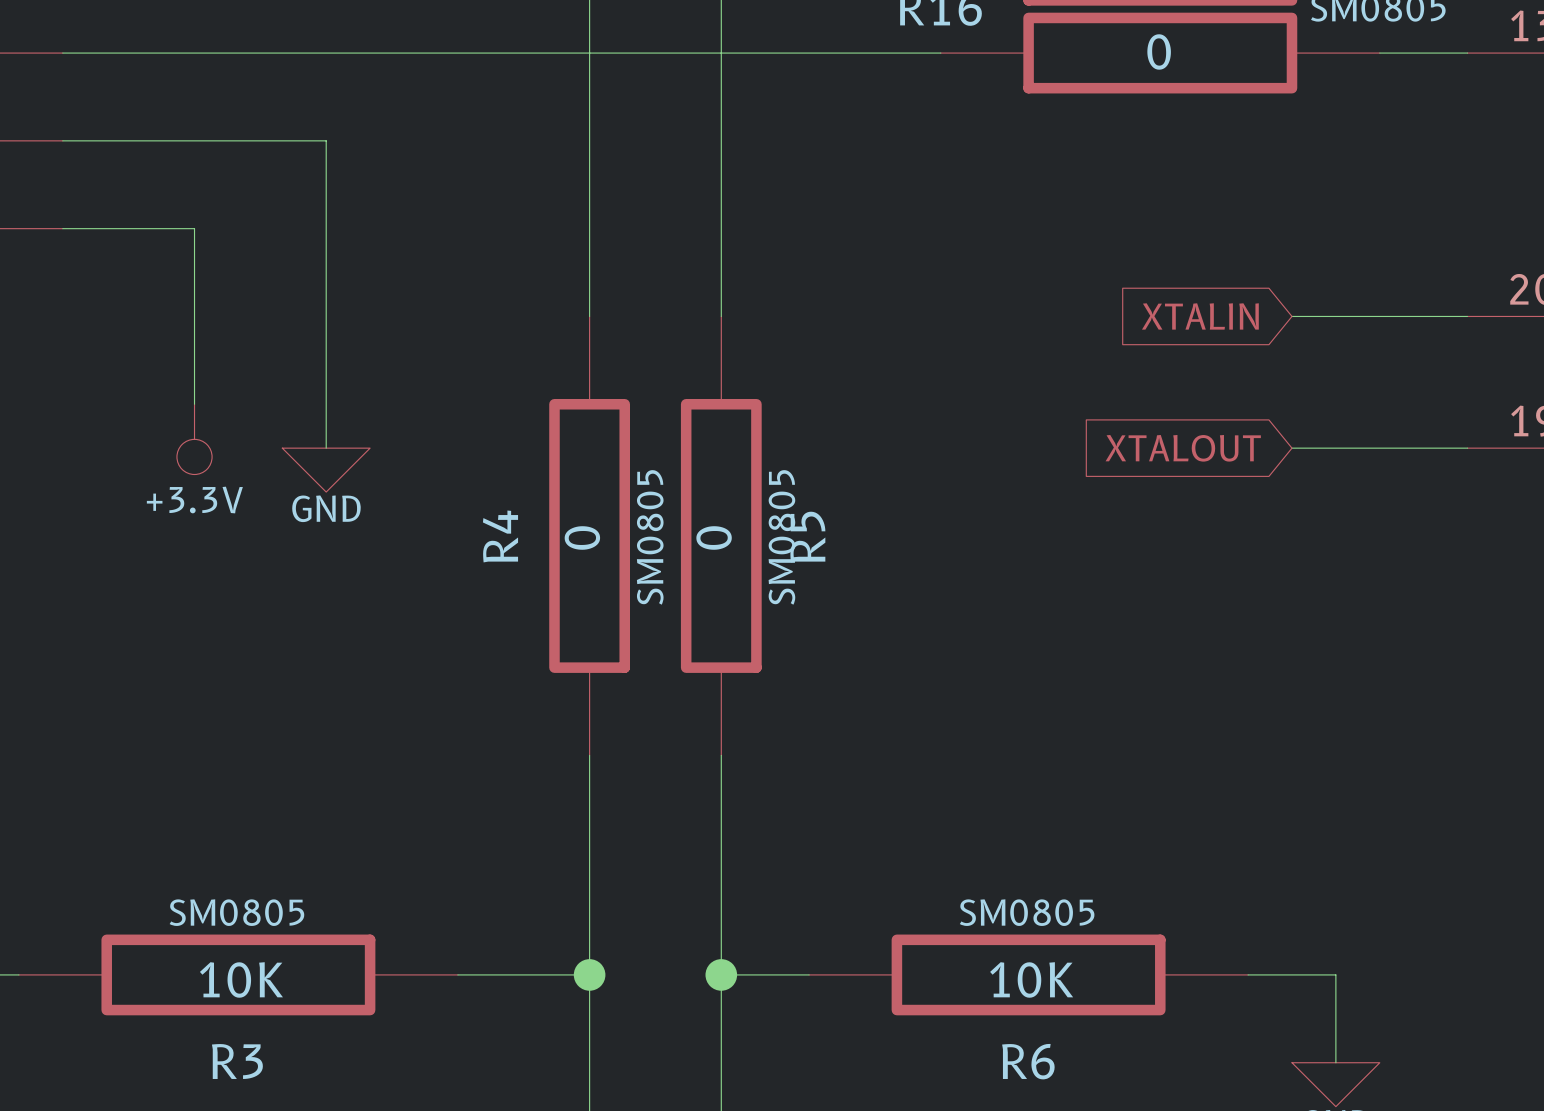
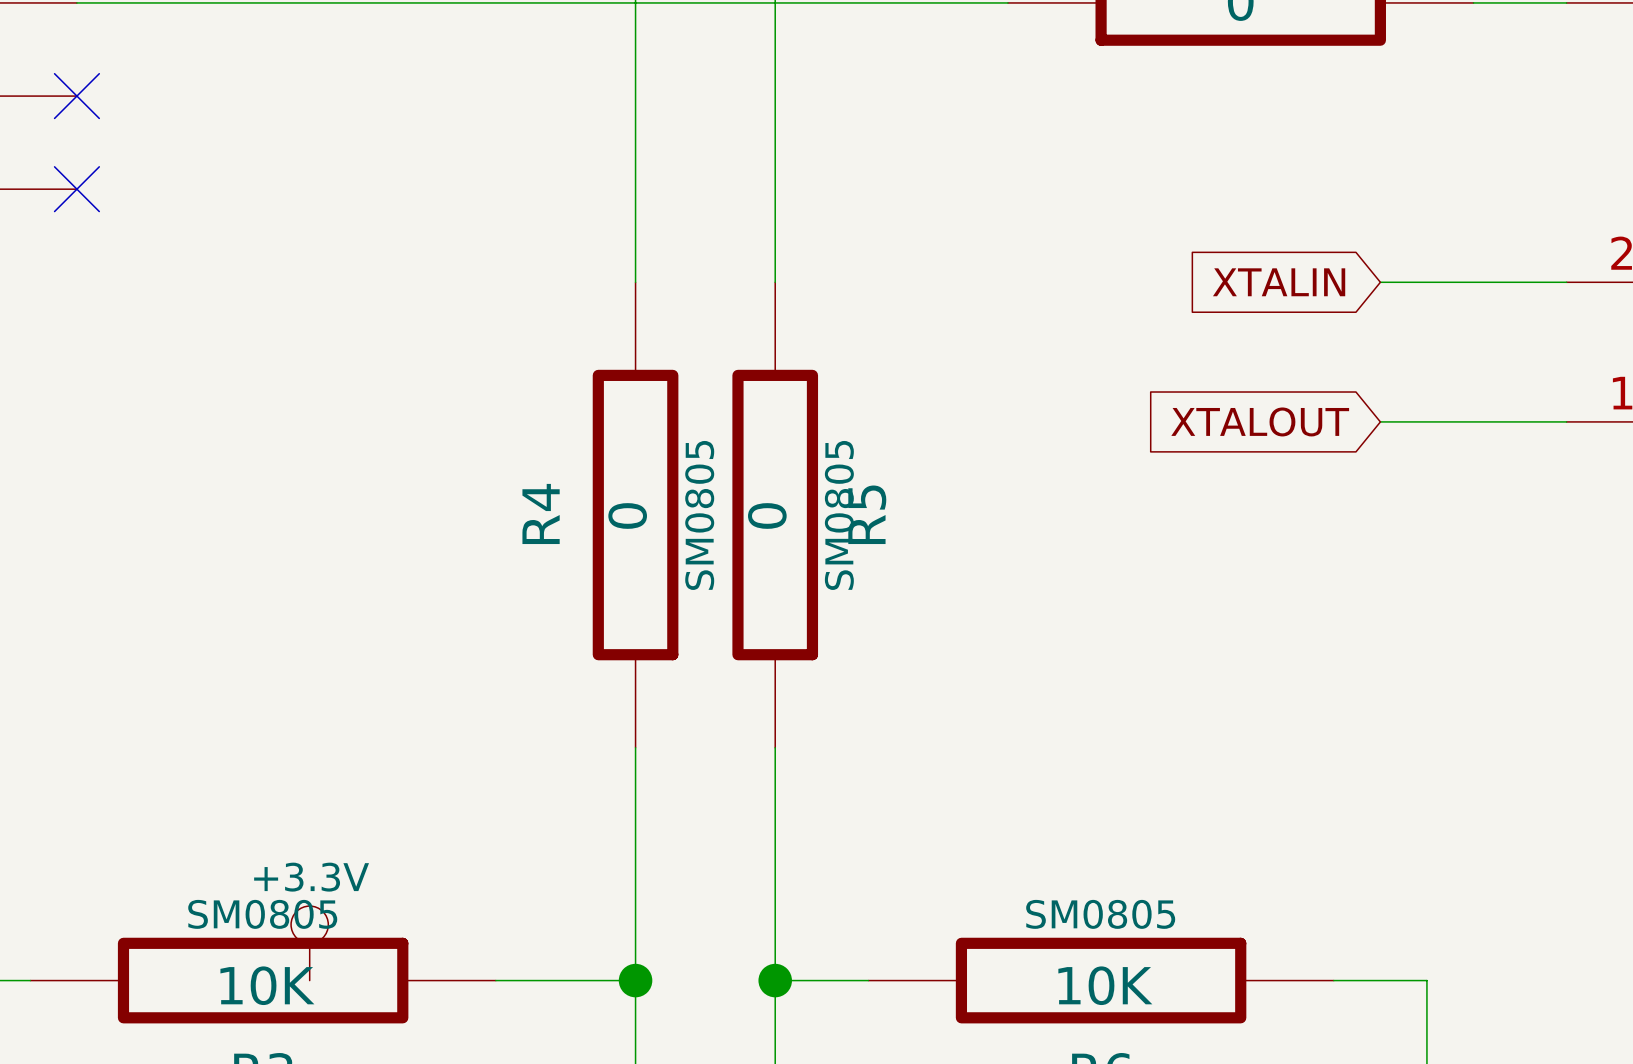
wire: (62, 140) (326, 140) (326, 448) -> none
no-connect mark: none -> (76, 96)
wire: (62, 228) (194, 228) (194, 404) -> none
no-connect mark: none -> (76, 189)
power symbol rotation: 0° (194, 439) -> 180° (309, 943)
power symbol position: +3.3V (194, 439) -> +3.3V (309, 943)
power symbol: GND (326, 470) -> none

